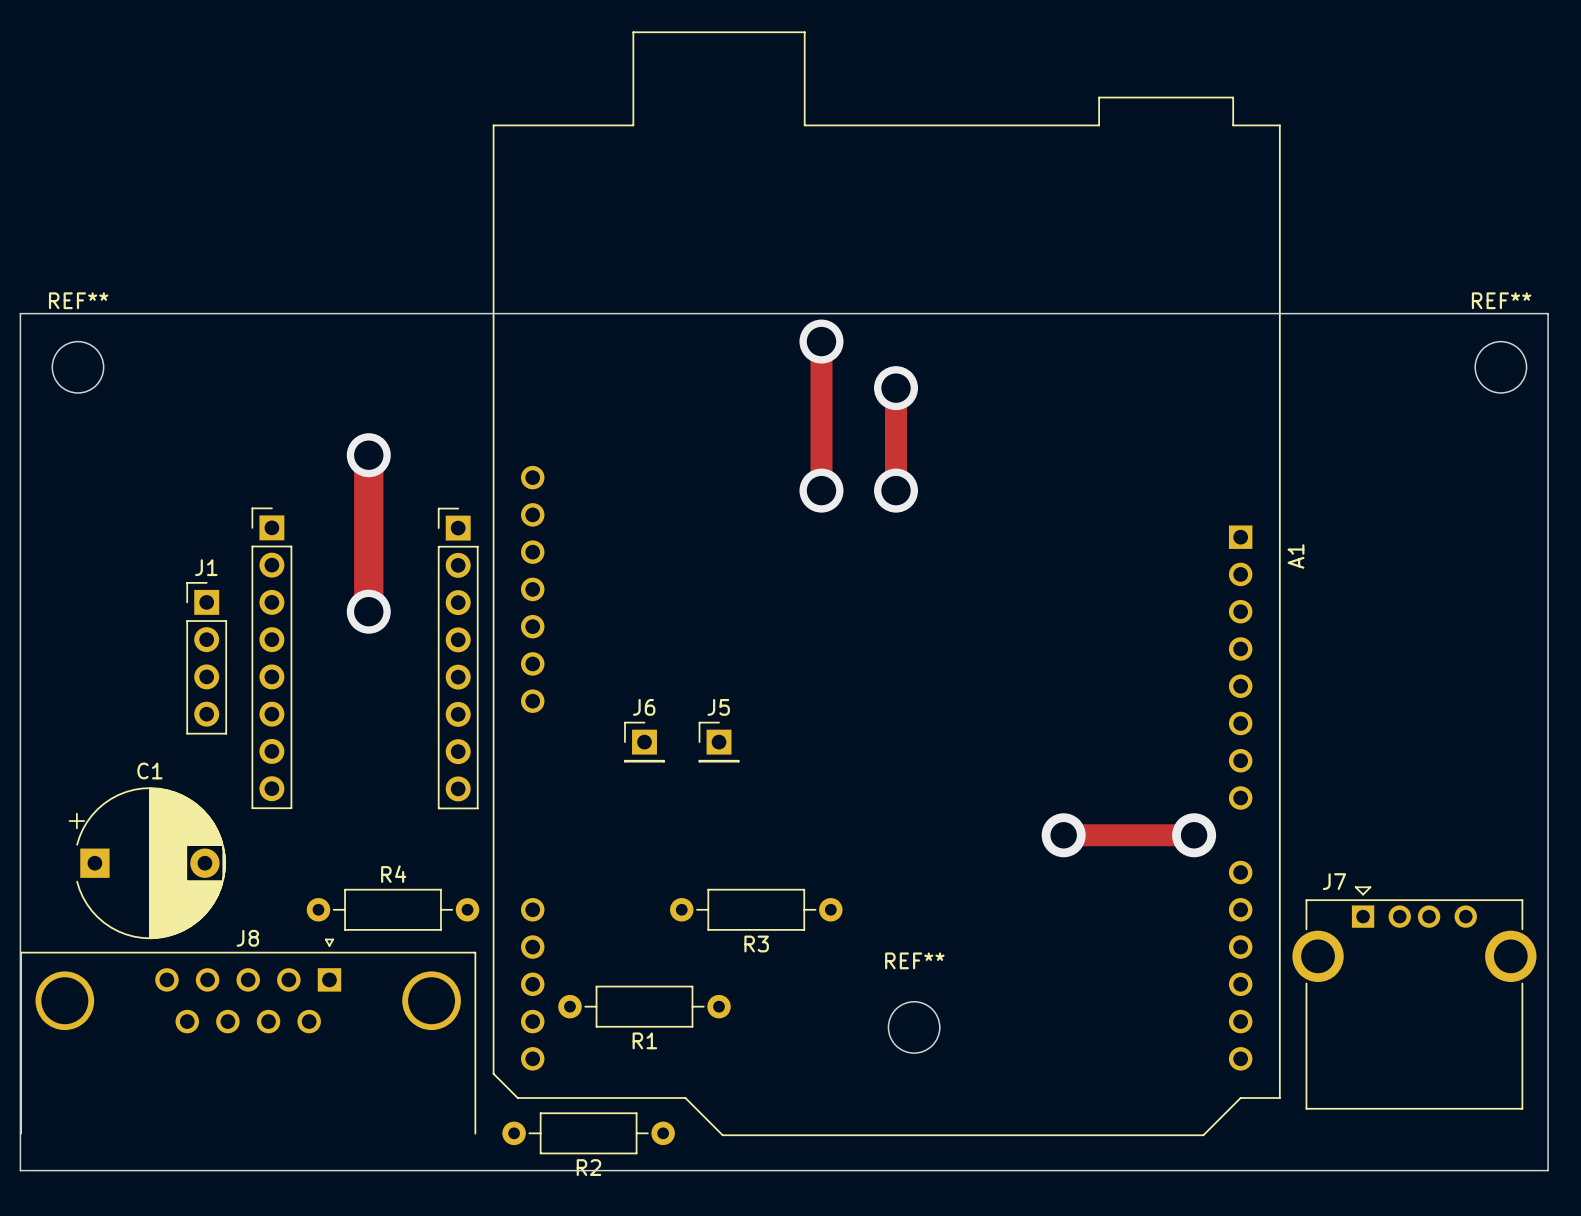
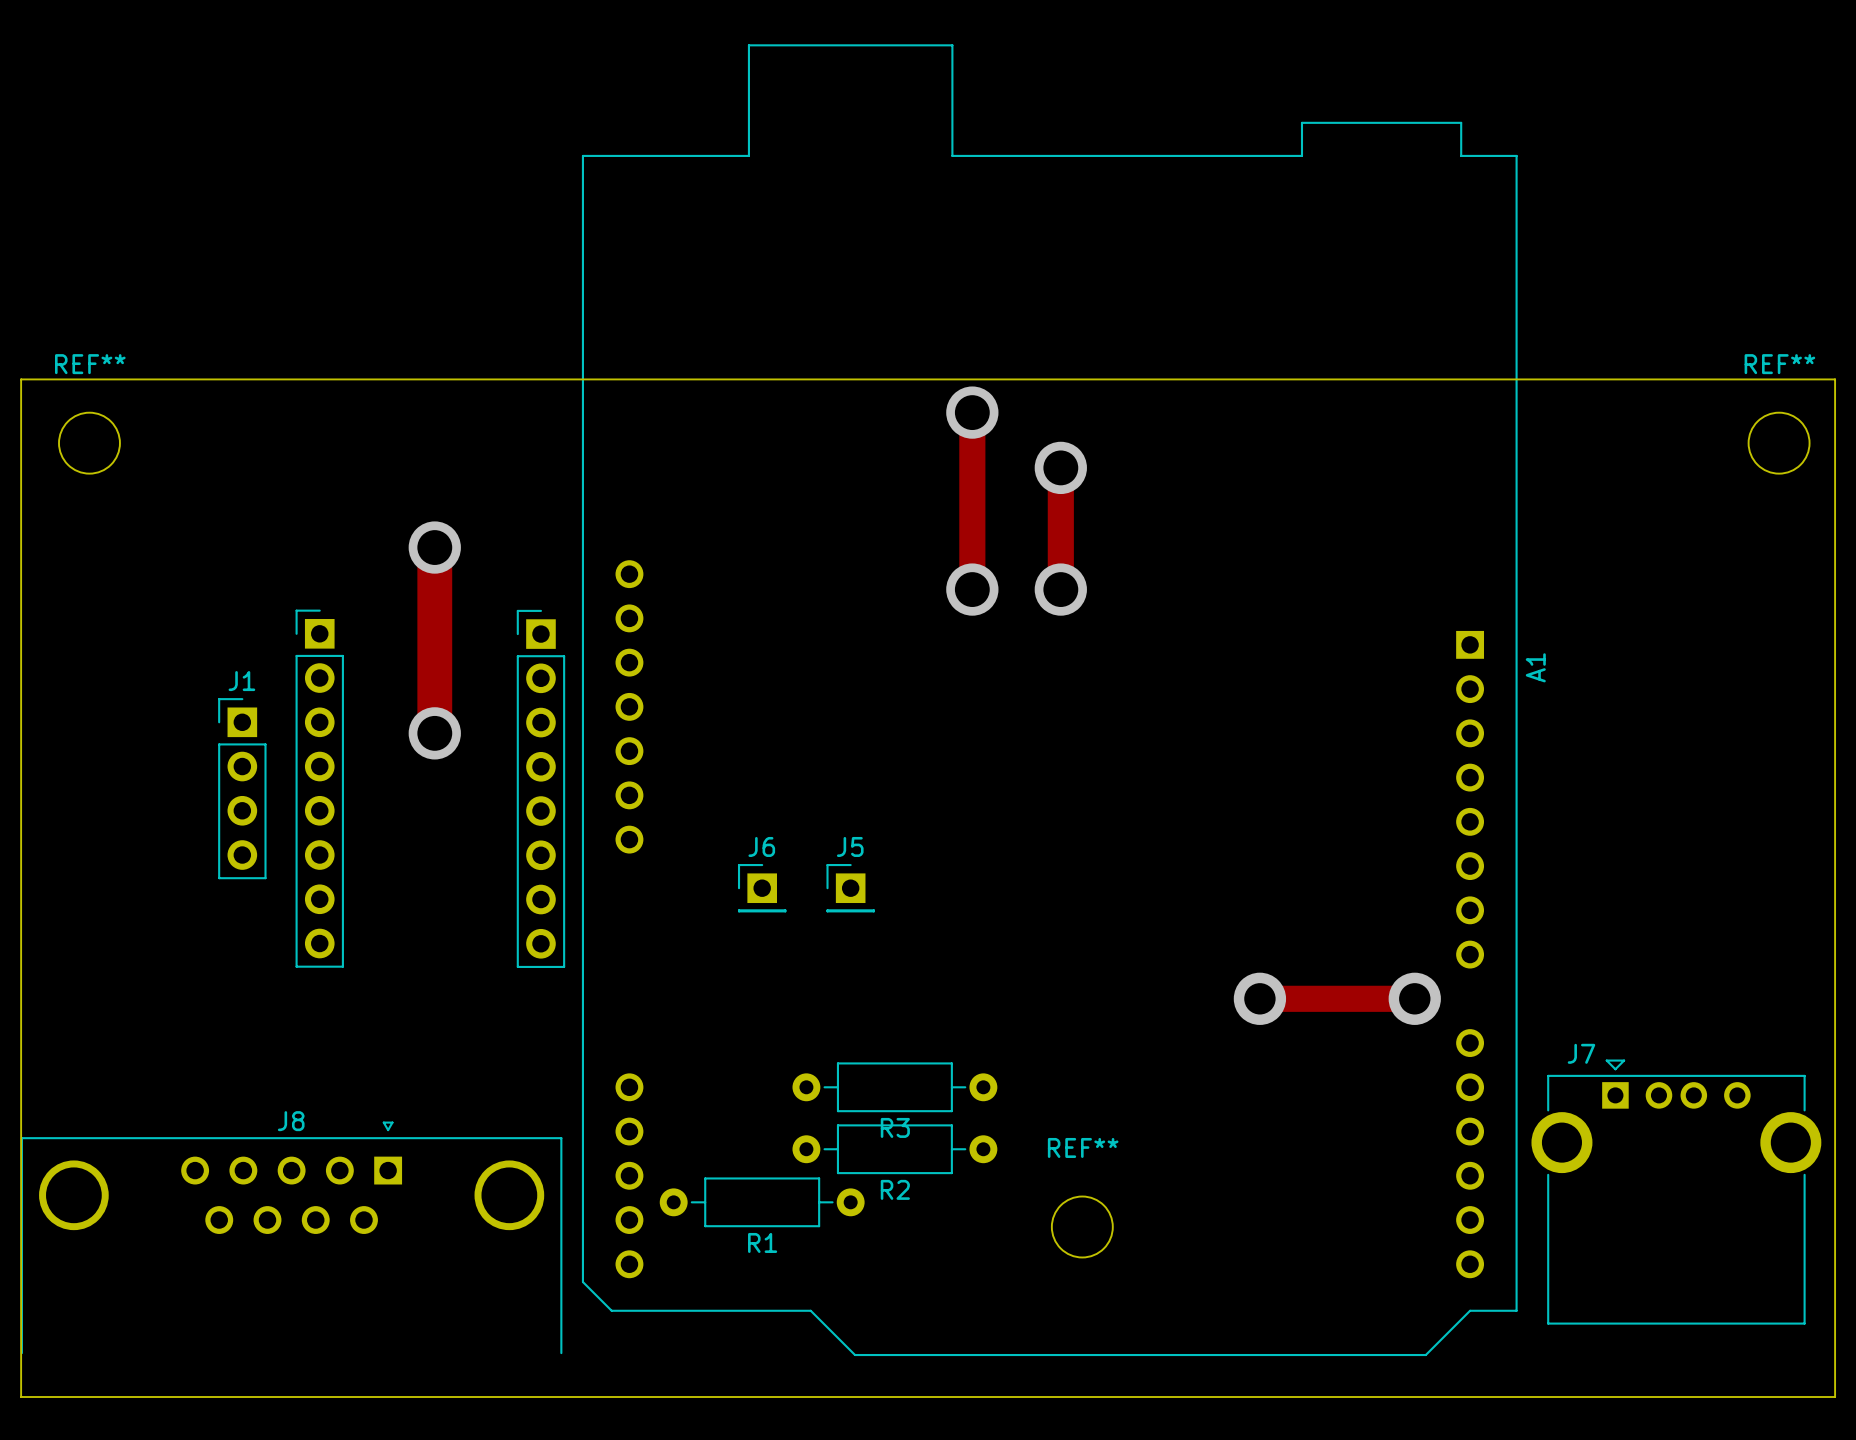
C1: (147, 863) -> none
R4: (392, 909) -> none
R2 position: (588, 1133) -> (894, 1149)

